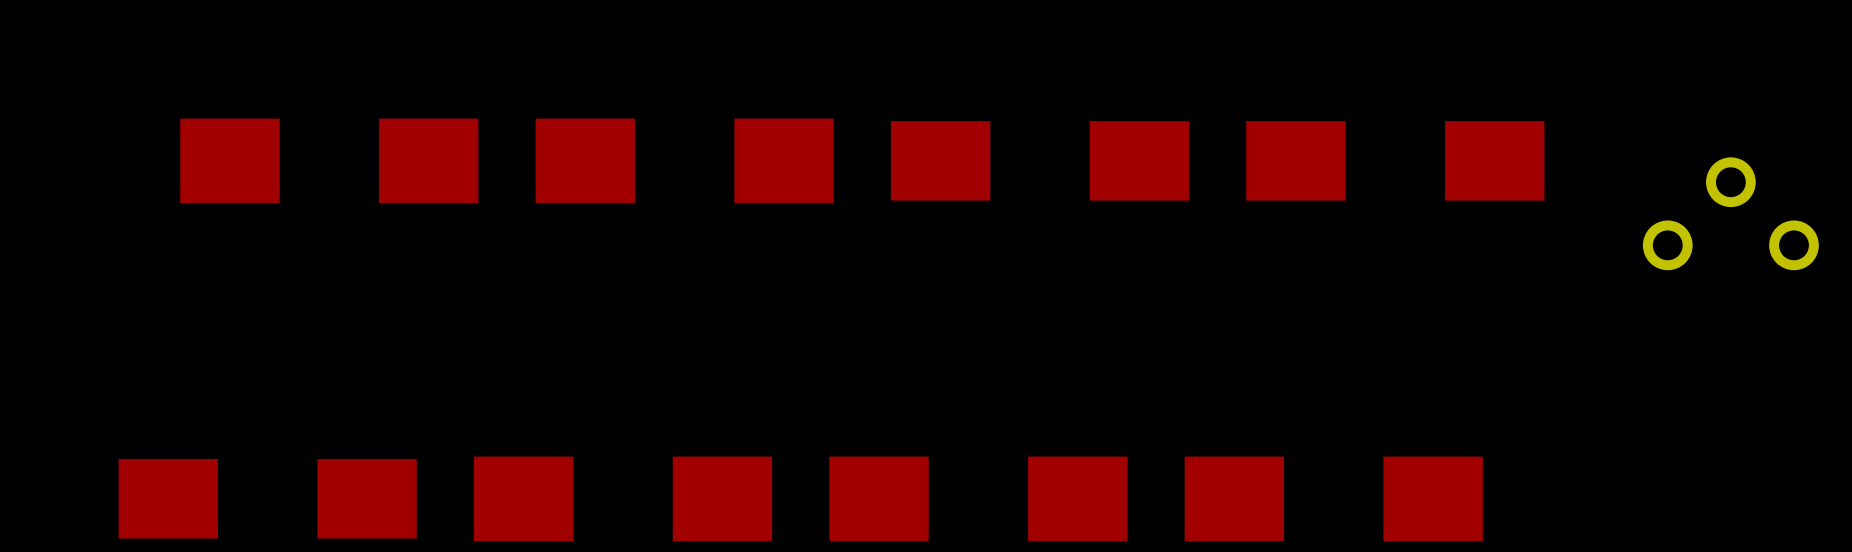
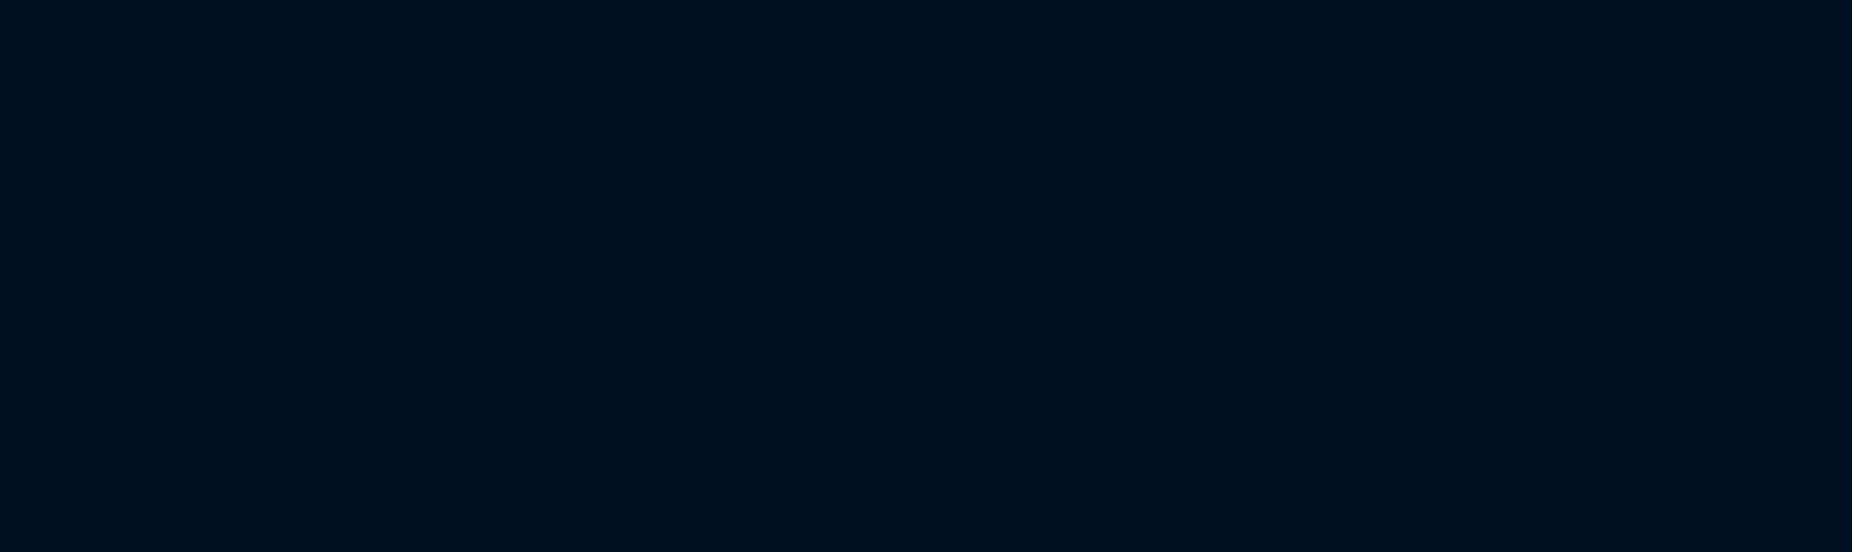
part: (329, 160) -> none
part: (684, 160) -> none
part: (1040, 160) -> none
part: (1395, 160) -> none
part: (1730, 213) -> none
part: (267, 498) -> none
part: (623, 498) -> none
part: (978, 498) -> none
part: (1333, 498) -> none

